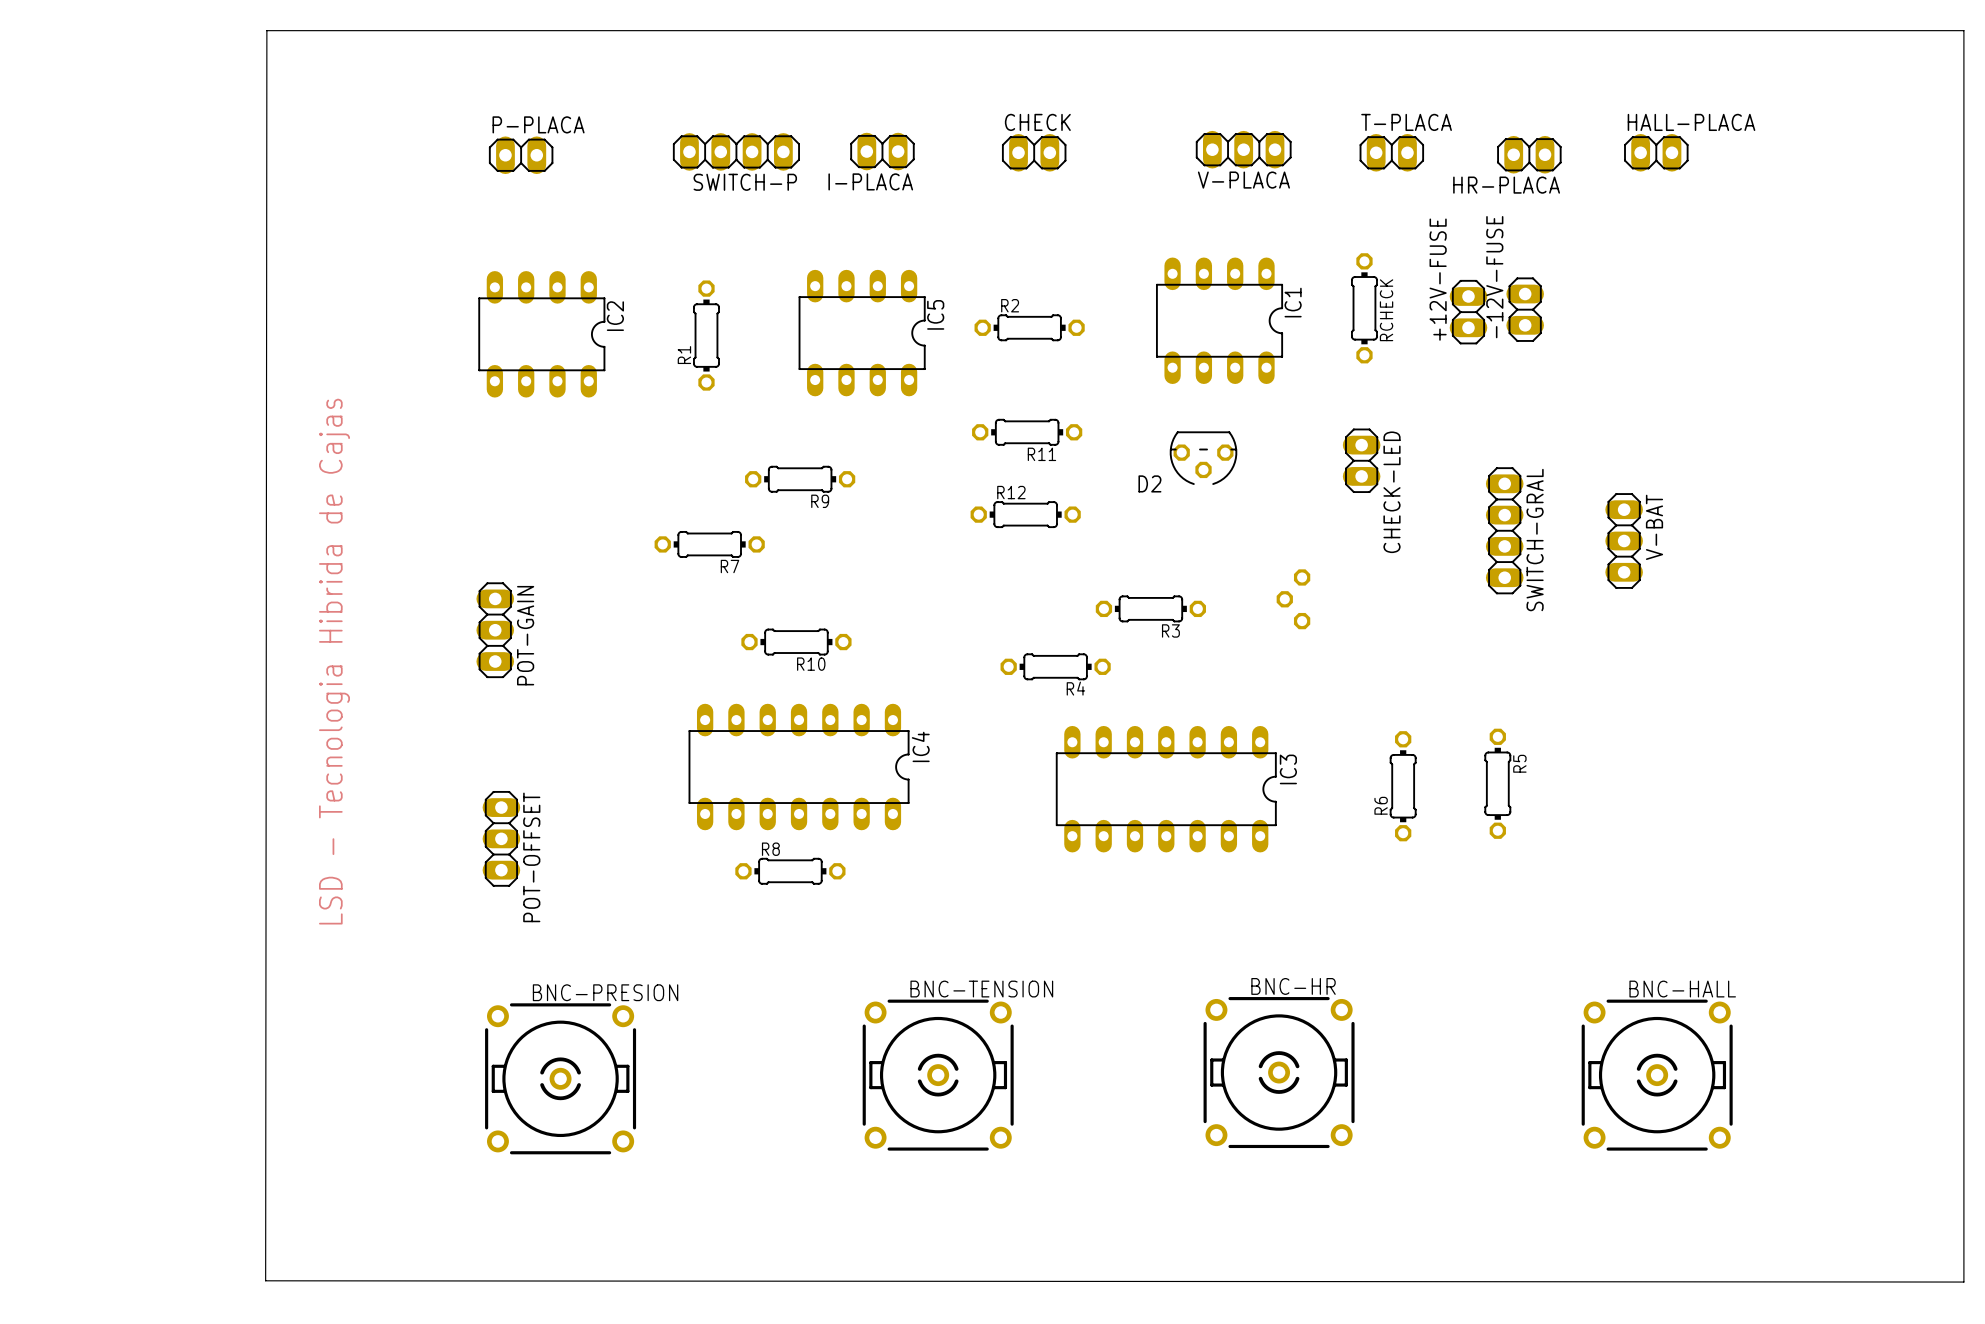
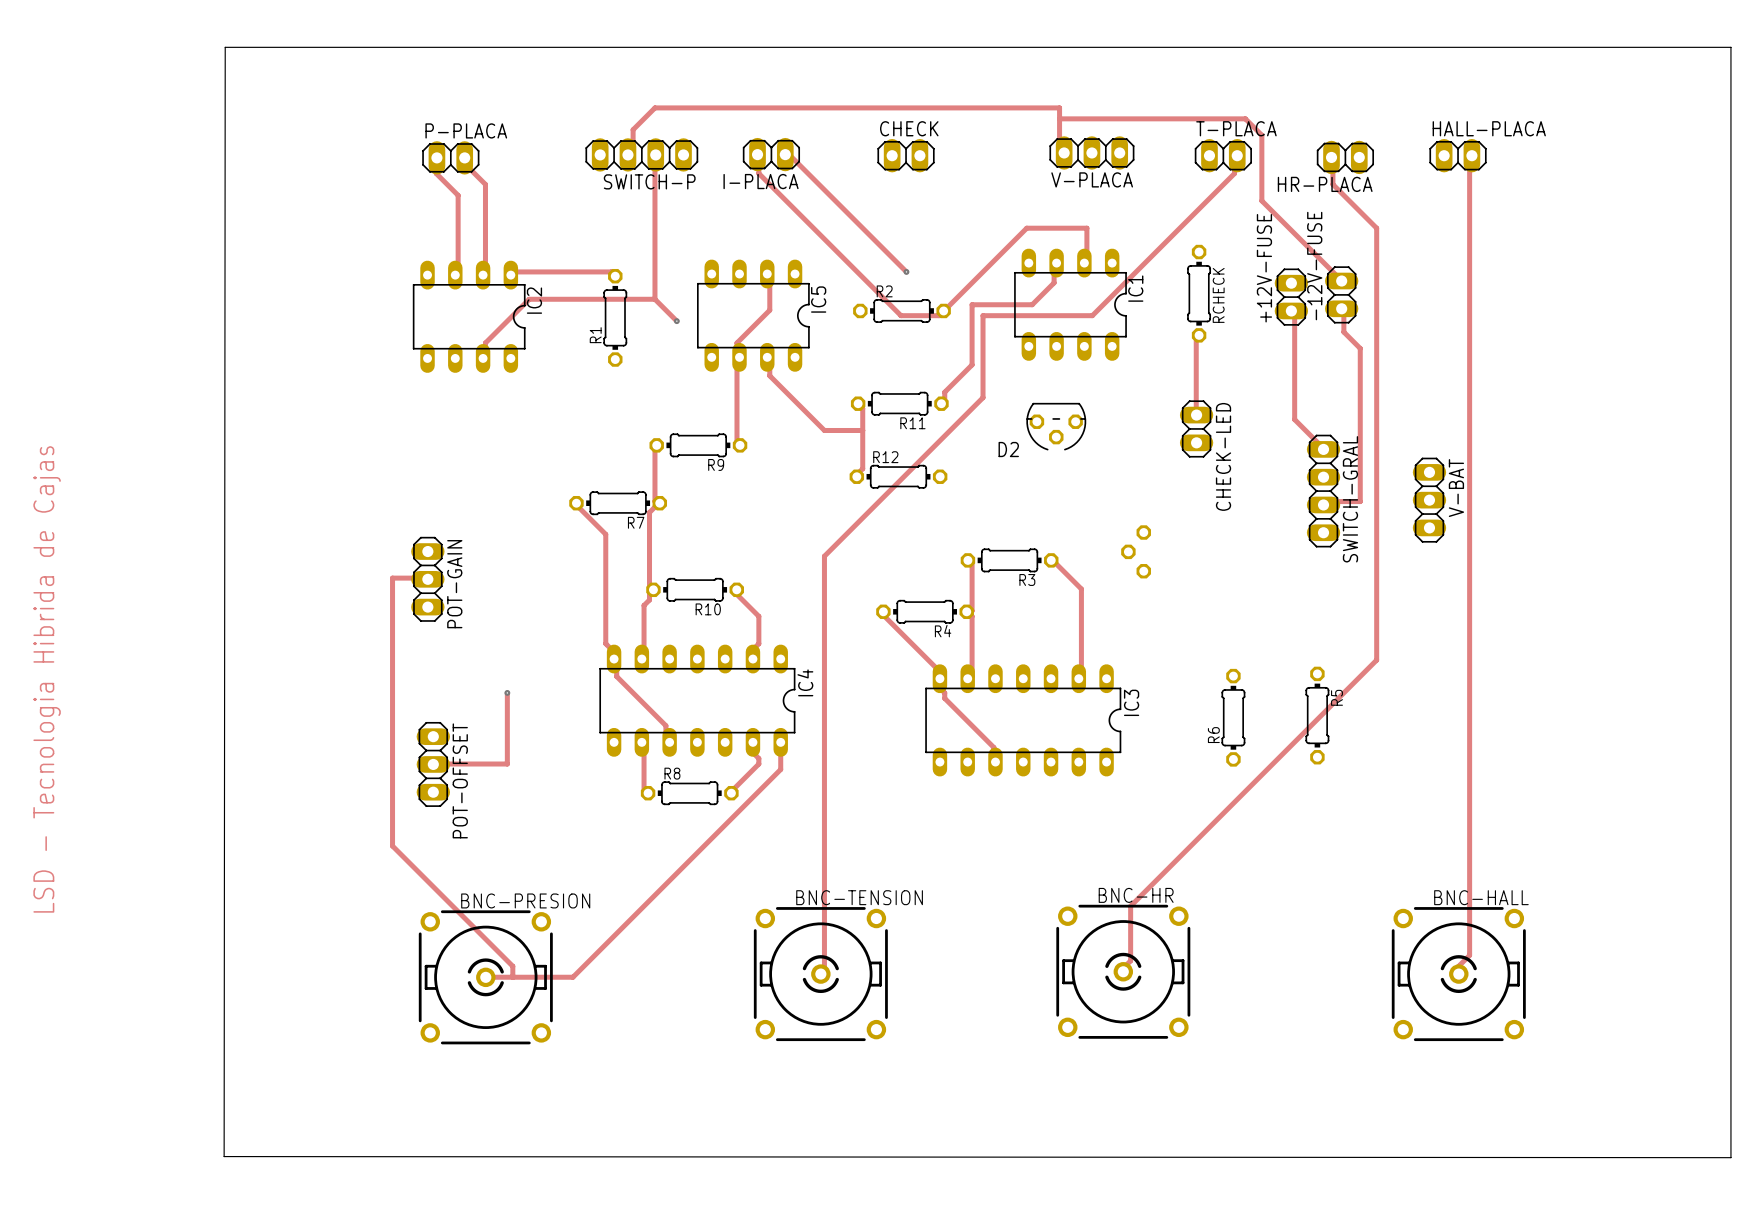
track: none -> (1059, 118) (1245, 118) (1261, 135) (1261, 200) (1341, 281)
track: none -> (1064, 152) (1059, 151) (1059, 107) (654, 107) (633, 129) (633, 151) (627, 154)
track: none -> (655, 154) (654, 299)
track: none -> (757, 154) (758, 173) (901, 315) (939, 315) (1026, 228) (1086, 228) (1086, 261) (1084, 263)
track: none -> (785, 154) (786, 151) (906, 271)
track: none -> (1237, 155) (1234, 157) (1234, 173) (1092, 315) (983, 315) (983, 397) (824, 556) (824, 971) (820, 974)
track: none -> (1471, 155) (1469, 157) (1469, 955) (1458, 966) (1458, 974)
track: none -> (1331, 157) (1332, 184) (1376, 228) (1376, 660) (1130, 906) (1130, 960) (1125, 966) (1125, 971) (1123, 971)
track: none -> (436, 157) (436, 173) (458, 195) (458, 271) (455, 275)
track: none -> (464, 157) (469, 162) (469, 168) (485, 184) (485, 271) (483, 275)
track: none -> (1056, 263) (1054, 266) (1054, 282) (1032, 304) (972, 304) (972, 364) (944, 392) (944, 403) (941, 403)
via: none -> (906, 271)
track: none -> (767, 274) (769, 277) (769, 310) (736, 343) (736, 353) (739, 357) (736, 359) (736, 441) (740, 445)
track: none -> (510, 275) (512, 271) (611, 271) (615, 276)
track: none -> (654, 299) (529, 299) (485, 343) (485, 353) (483, 358)
track: none -> (654, 299) (676, 321)
track: none -> (1341, 308) (1343, 310) (1343, 332) (1360, 348) (1360, 501) (1327, 501) (1323, 504)
track: none -> (1291, 310) (1294, 315) (1294, 419) (1323, 449)
via: none -> (676, 321)
track: none -> (1199, 335) (1196, 337) (1196, 415)
track: none -> (767, 357) (769, 359) (769, 375) (824, 430) (862, 430)
track: none -> (858, 403) (862, 408) (862, 468) (856, 476)
track: none -> (656, 445) (654, 446) (654, 501) (659, 503) (649, 512) (649, 589) (653, 589) (649, 594) (649, 599) (644, 605) (644, 654) (641, 659)
track: none -> (576, 503) (605, 534) (605, 643) (611, 649) (611, 654) (614, 659) (616, 660) (616, 676) (665, 725) (665, 742) (669, 742)
track: none -> (967, 560) (972, 561) (972, 610) (966, 611) (972, 616) (972, 676) (967, 678)
track: none -> (1051, 560) (1081, 589) (1081, 676) (1078, 678)
track: none -> (427, 579) (392, 578) (392, 846) (512, 966) (512, 977)
track: none -> (736, 589) (736, 594) (758, 616) (758, 643) (753, 649) (752, 659)
text: LSD - Tecnologia Hibrida de Cajas (334, 661) -> none
track: none -> (883, 611) (884, 616) (939, 671) (939, 687) (944, 692) (944, 698) (993, 747) (995, 762)
text: none -> LSD - Tecnologia Hibrida de Cajas (47, 679)
track: none -> (507, 692) (507, 764) (433, 764)
via: none -> (507, 692)
track: none -> (641, 742) (644, 747) (644, 791) (648, 793)
track: none -> (752, 742) (753, 753) (758, 758) (758, 764) (731, 793)
track: none -> (780, 742) (780, 769) (572, 977) (485, 977)

